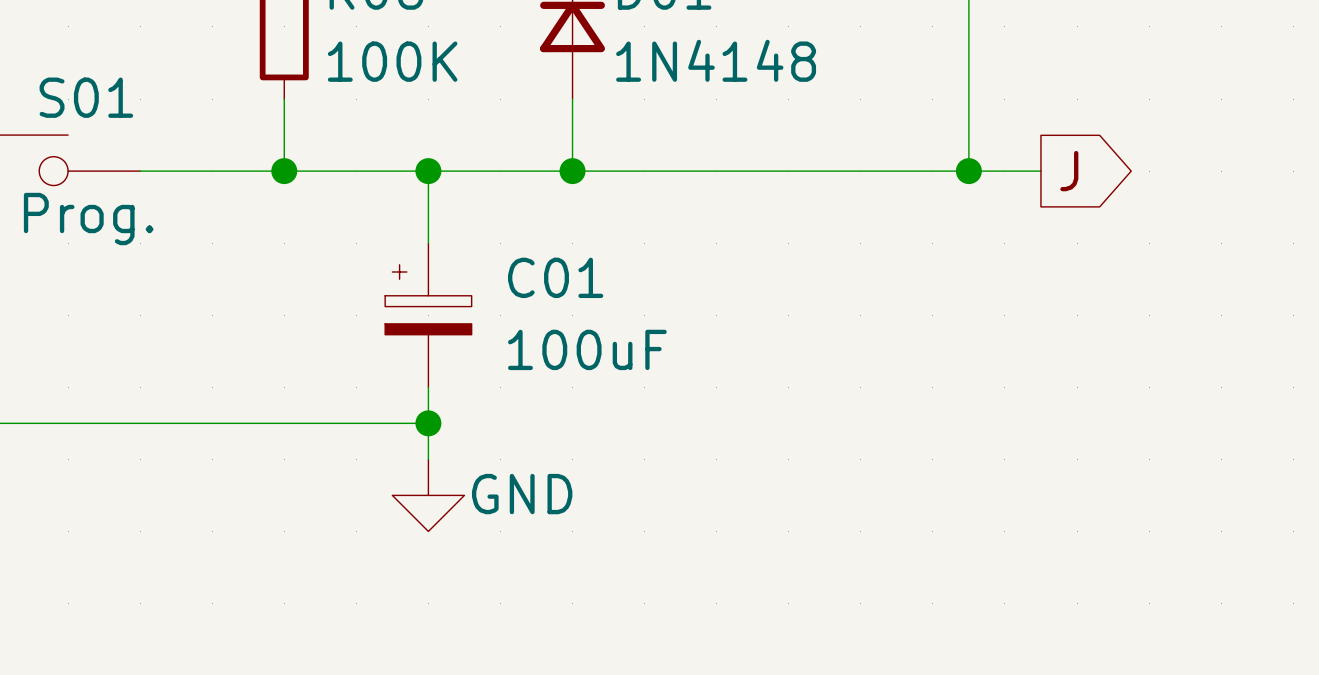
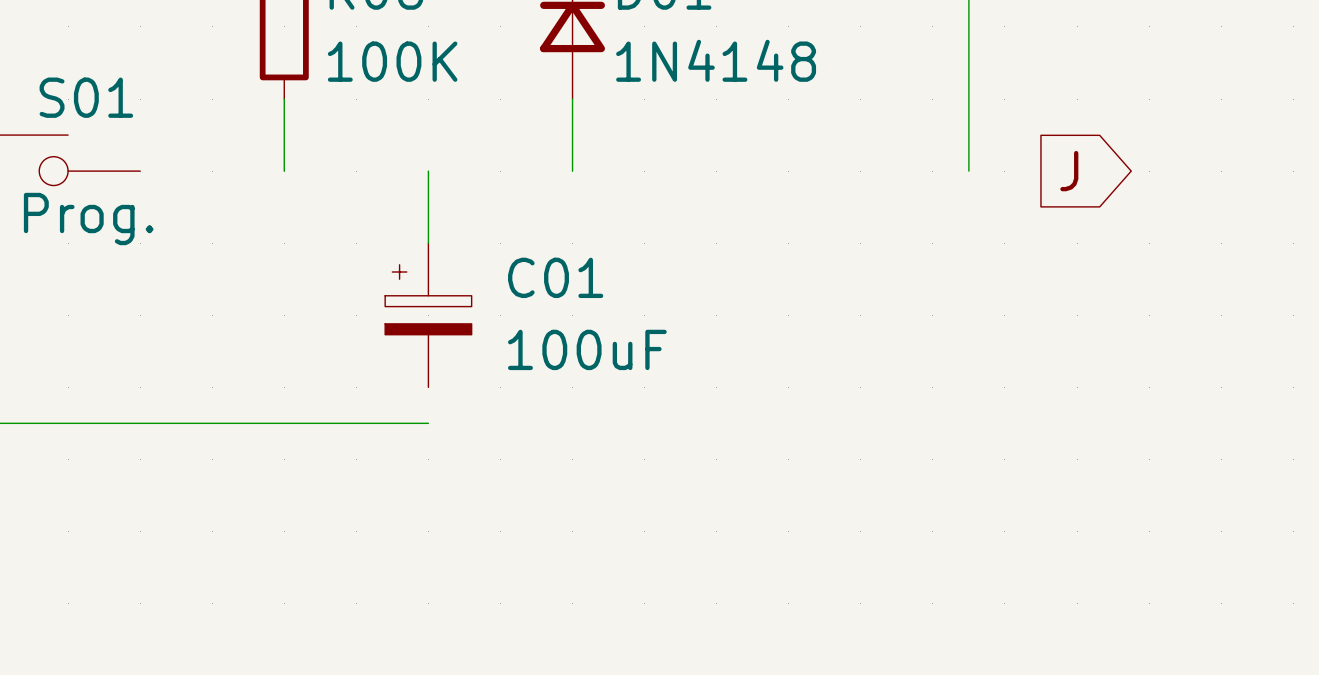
wire: (140, 171) (1040, 171) -> none
junction: (284, 171) -> none
junction: (428, 171) -> none
junction: (572, 171) -> none
junction: (968, 171) -> none
wire: (428, 387) (428, 459) -> none
junction: (428, 423) -> none
power symbol: GND (428, 495) -> none

